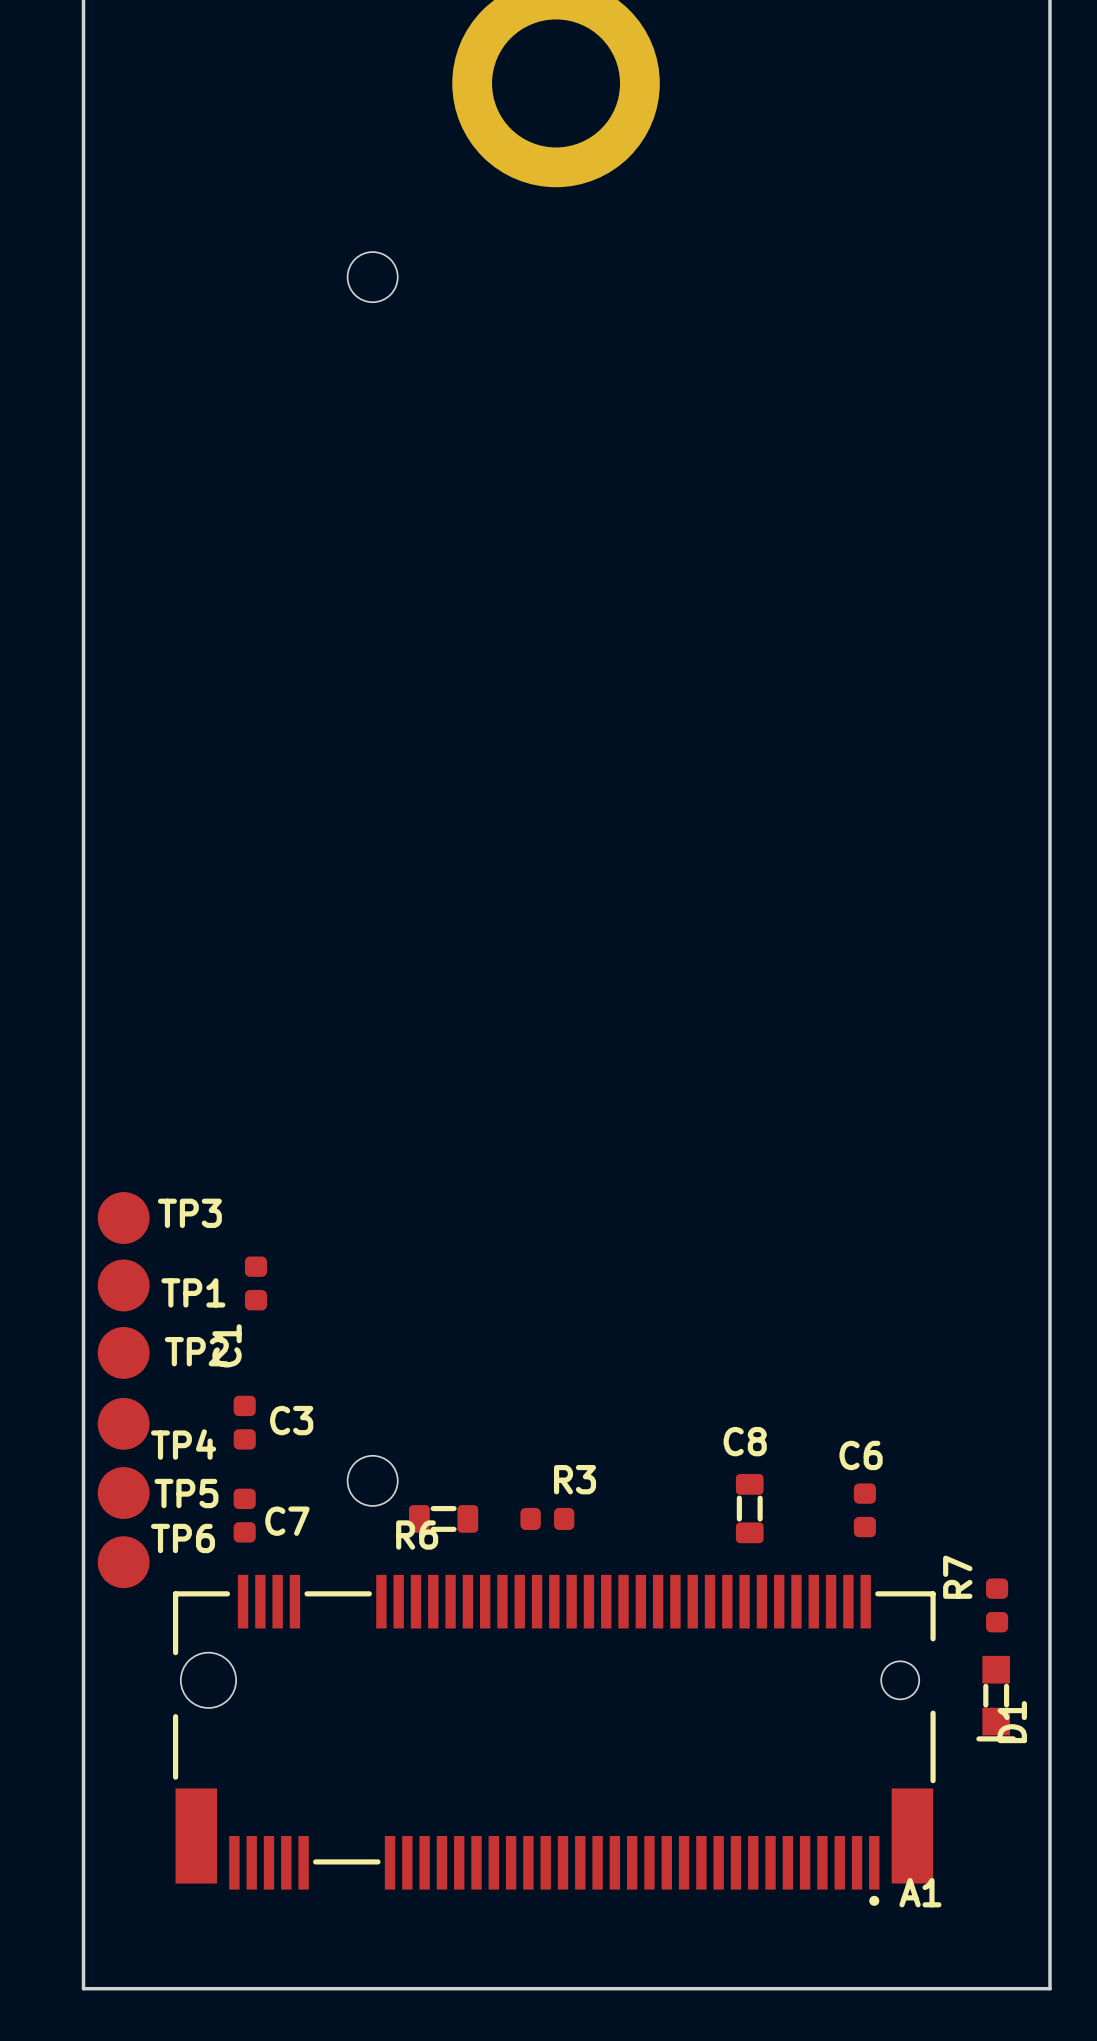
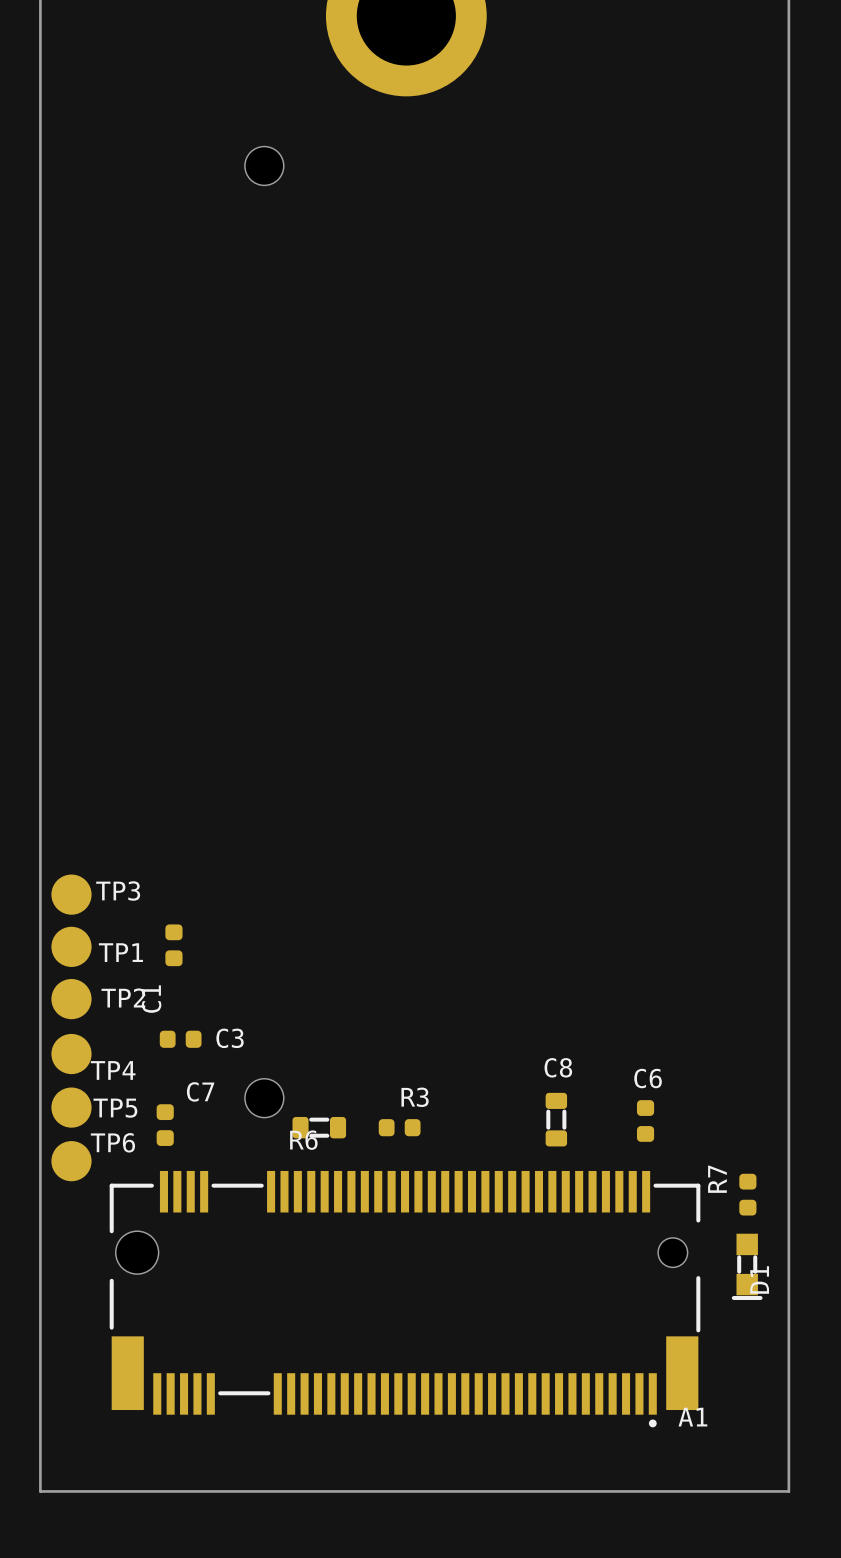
C3 rotation: 0° (244, 1422) -> 90° clockwise (180, 1039)
C7 name position: C7 (287, 1521) -> C7 (200, 1091)

